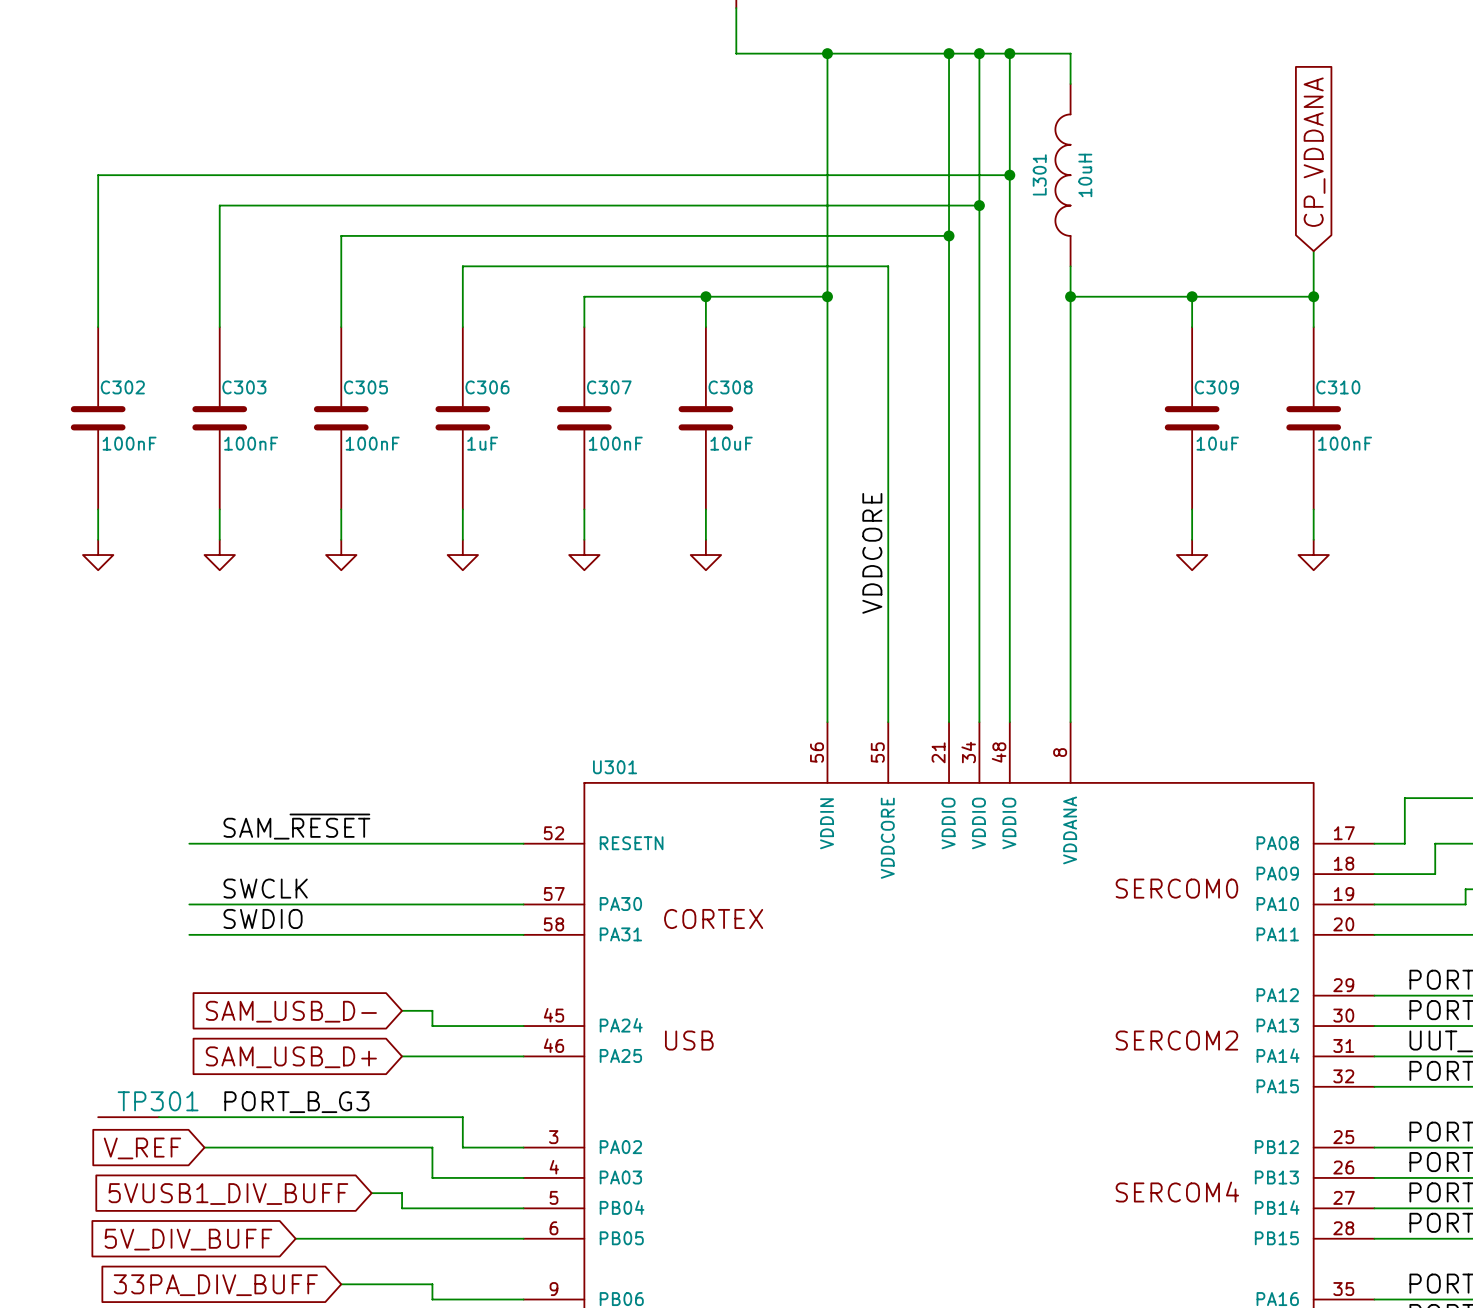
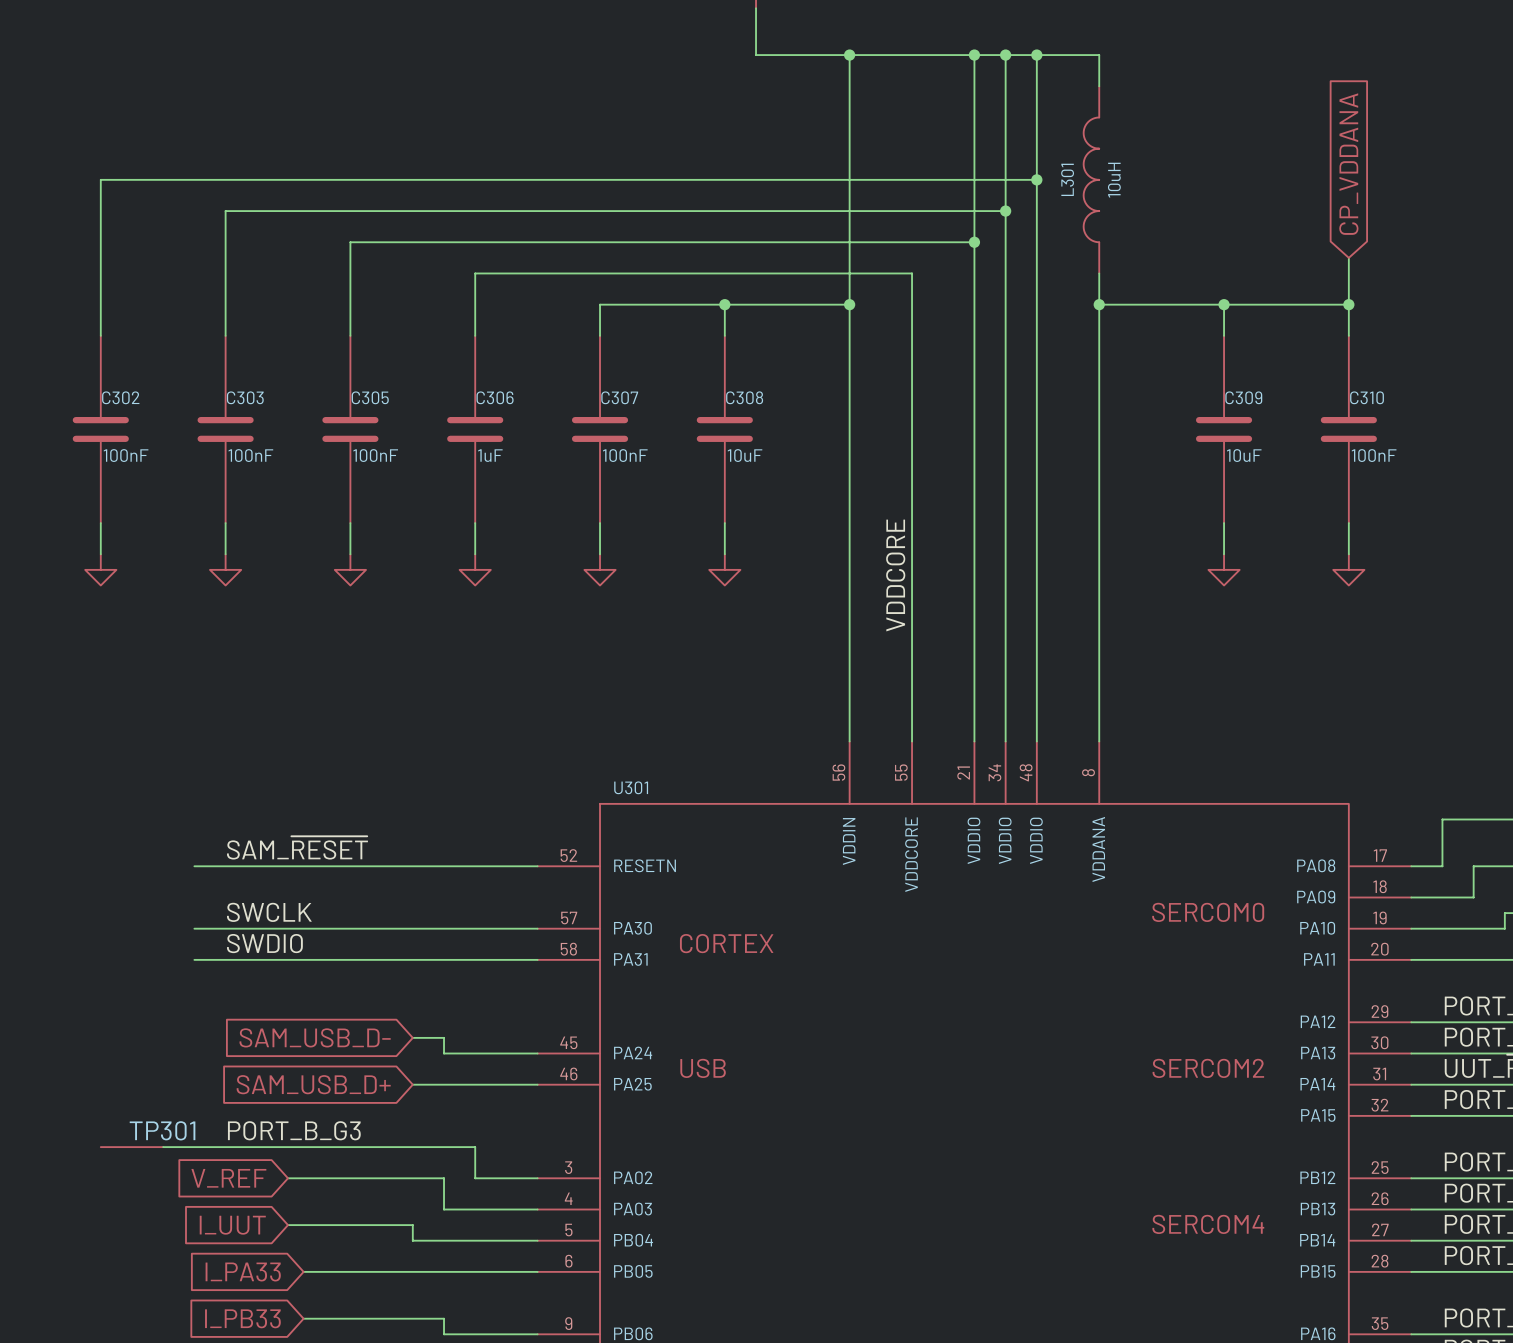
wire: (204, 1147) (280, 1147) -> none
global label position: V_REF (142, 1148) -> V_REF (228, 1178)
wire: none -> (288, 1225) (381, 1225)
global label: none -> I_UUT (232, 1225)
global label: 5VUSB1_DIV_BUFF (228, 1194) -> none
global label: 5V_DIV_BUFF (188, 1239) -> I_PA33 (243, 1272)
wire: none -> (303, 1318) (350, 1318)
global label: 33PA_DIV_BUFF (215, 1285) -> none
global label: none -> I_PB33 (242, 1318)

